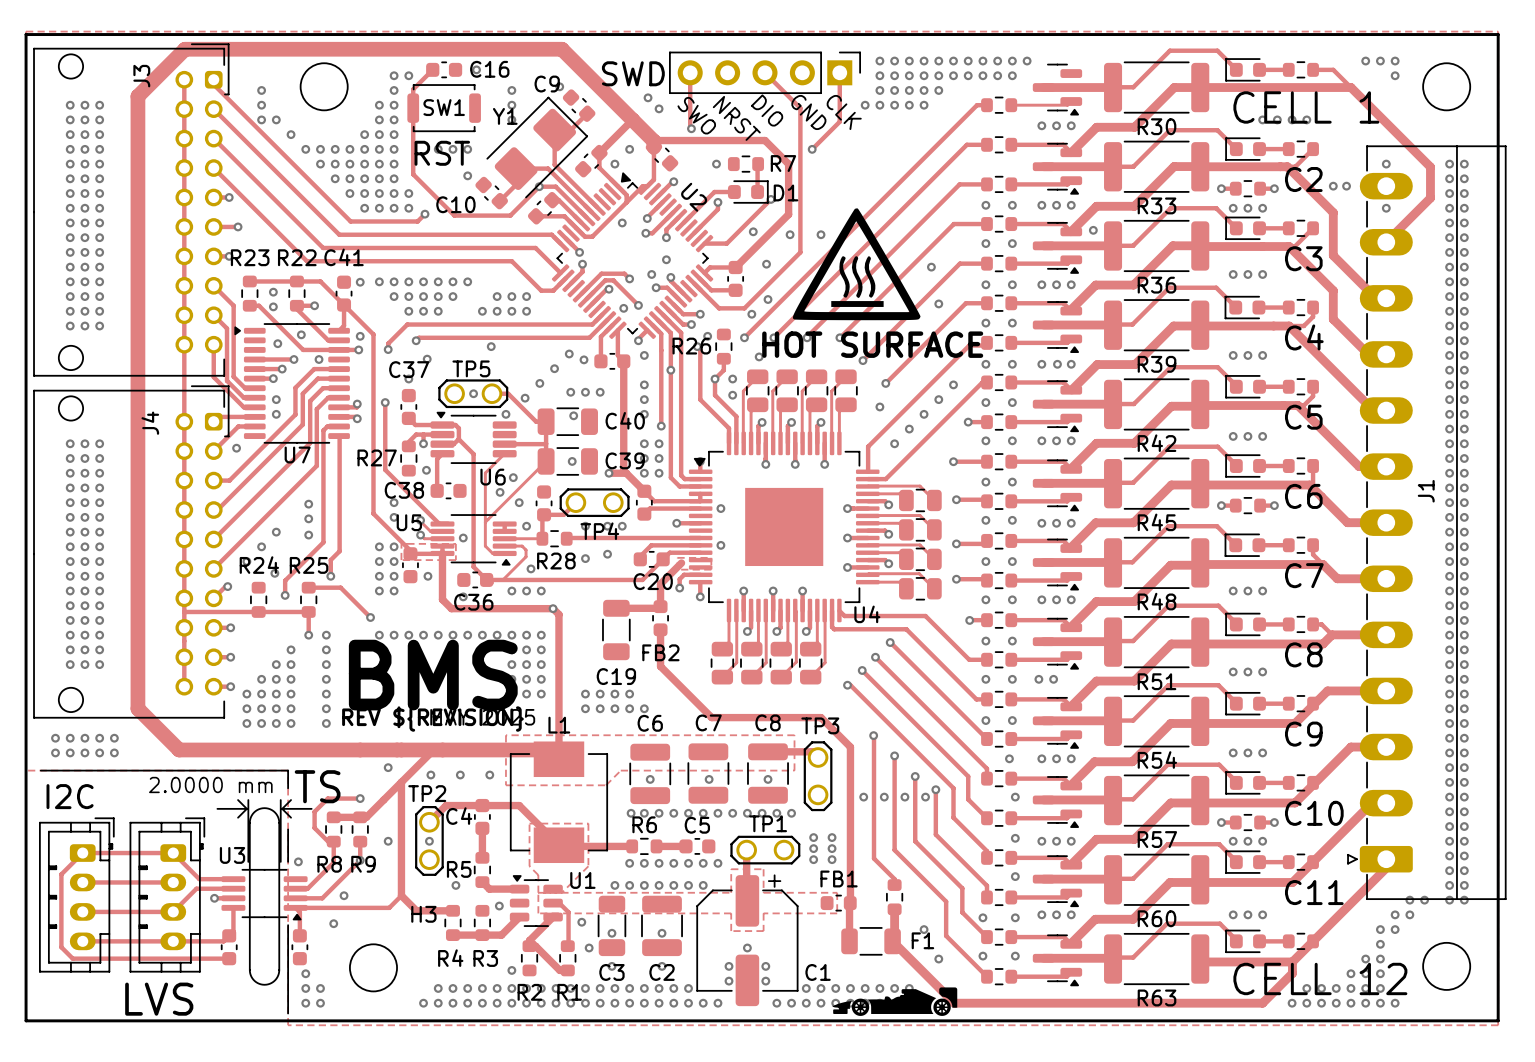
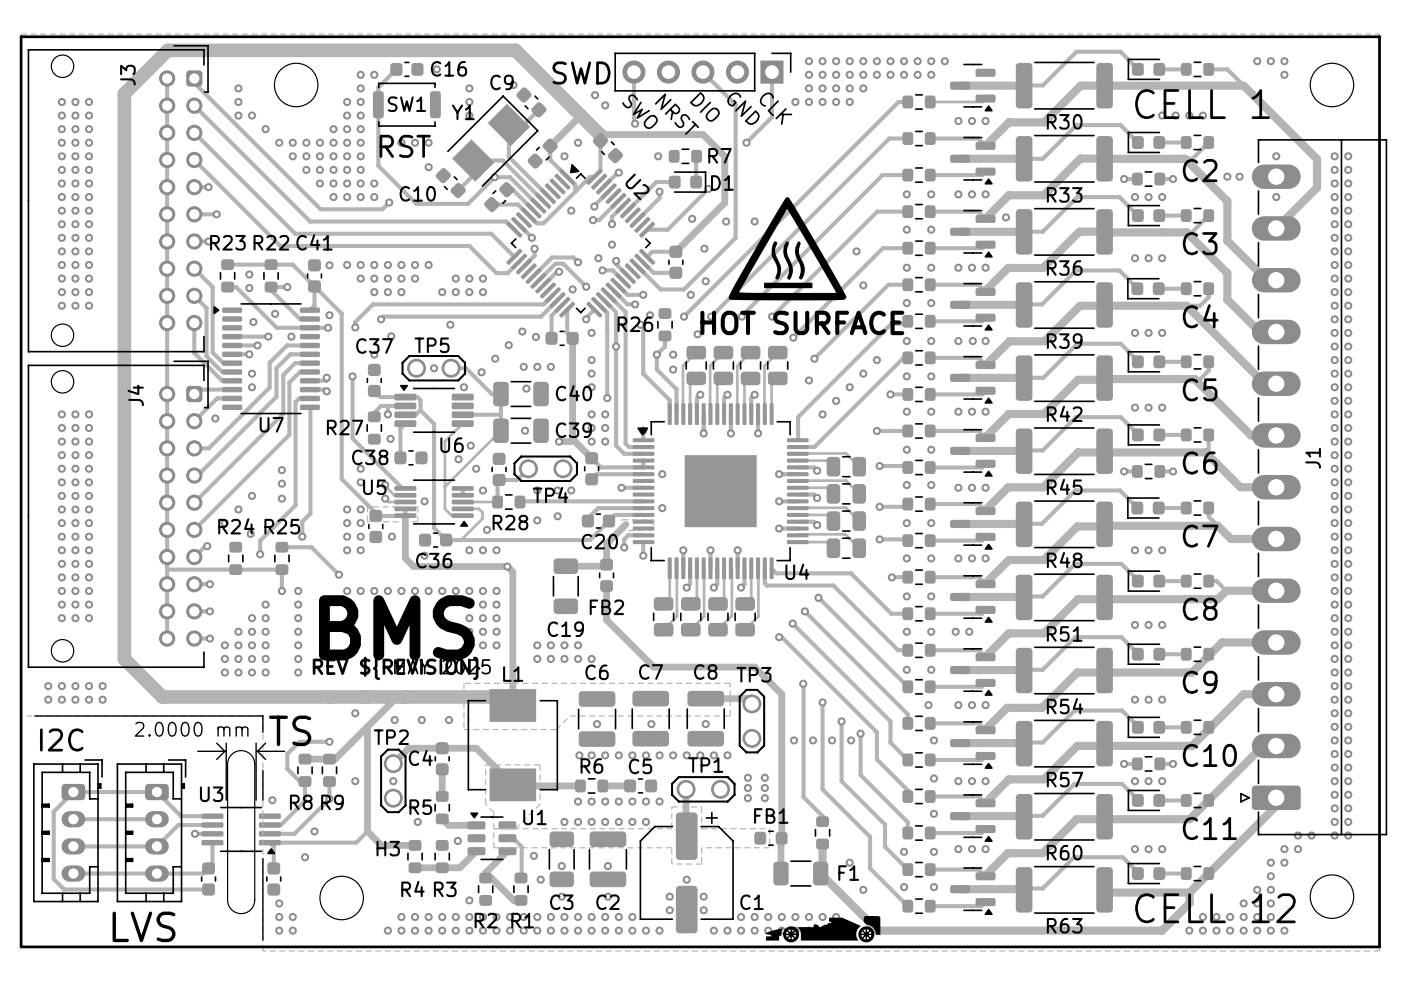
Y1 footprint: [486, 96, 589, 199] -> [447, 95, 539, 187]

